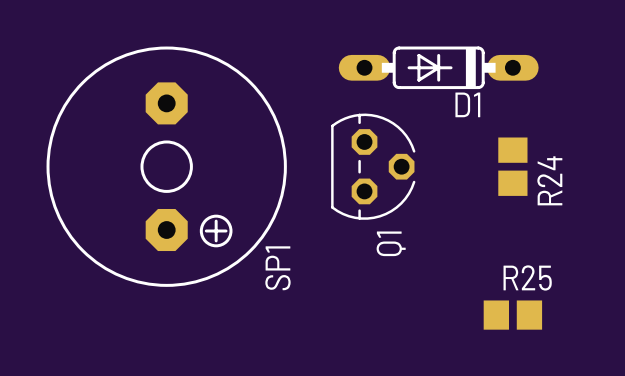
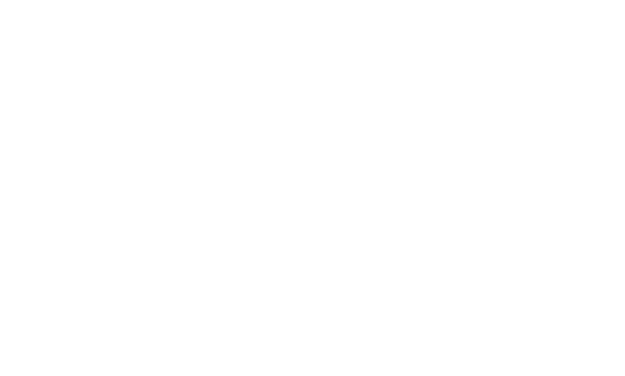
D1: (438, 67) -> none
SP1: (166, 166) -> none
Q1: (373, 166) -> none
R24: (512, 166) -> none
R25: (512, 315) -> none

